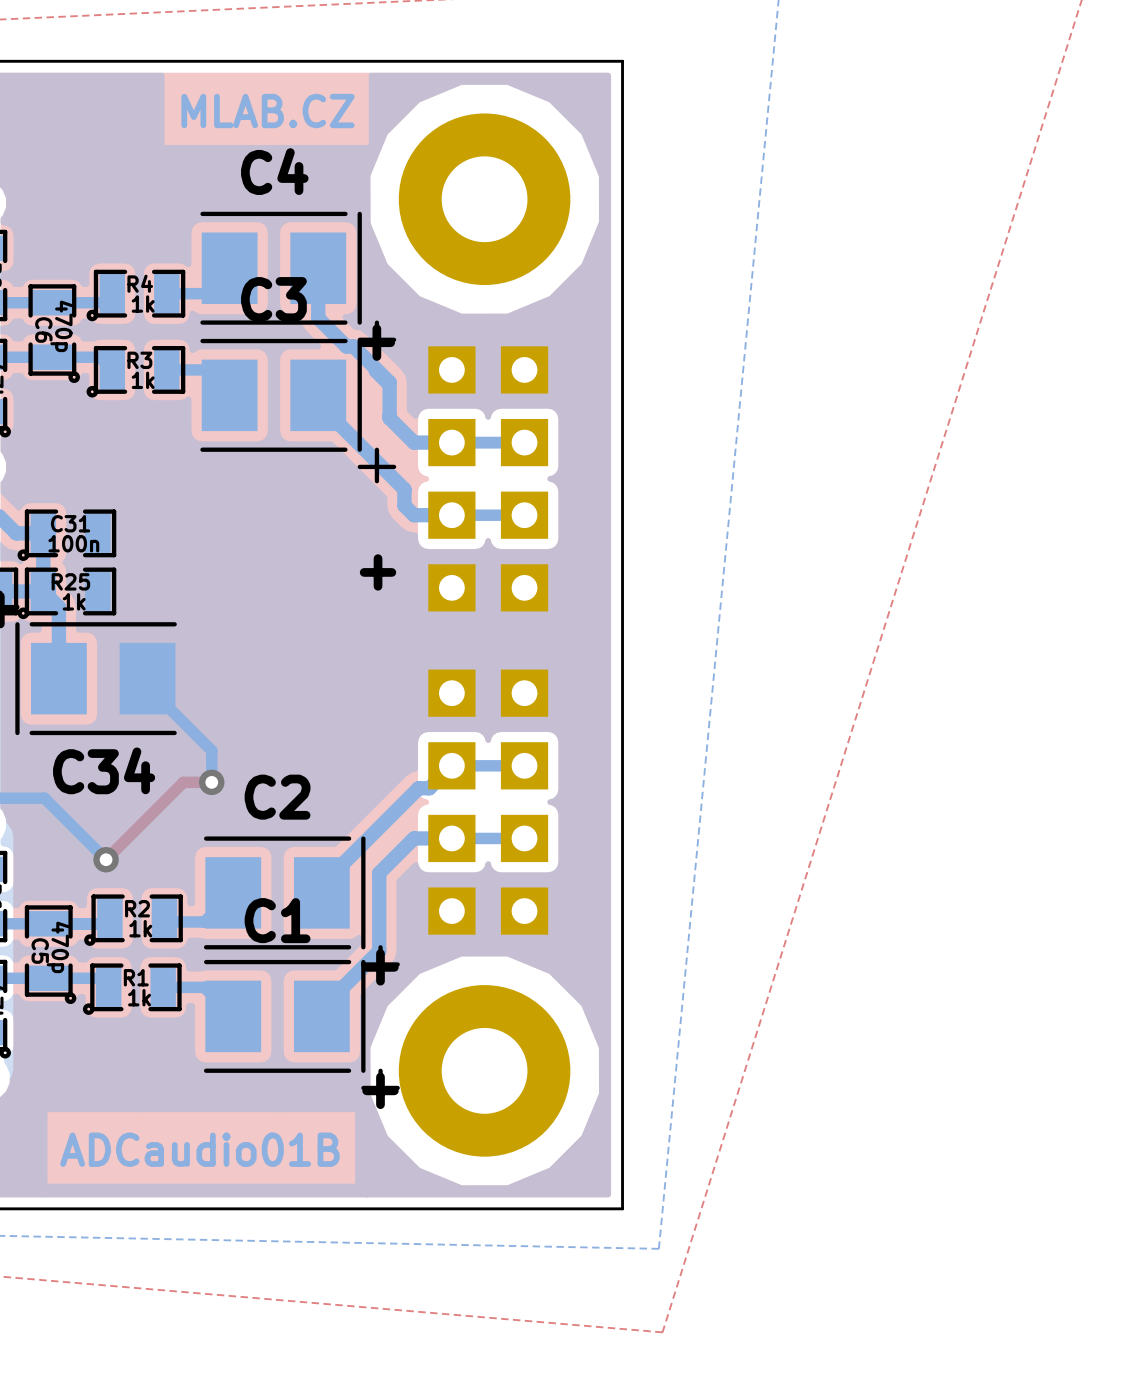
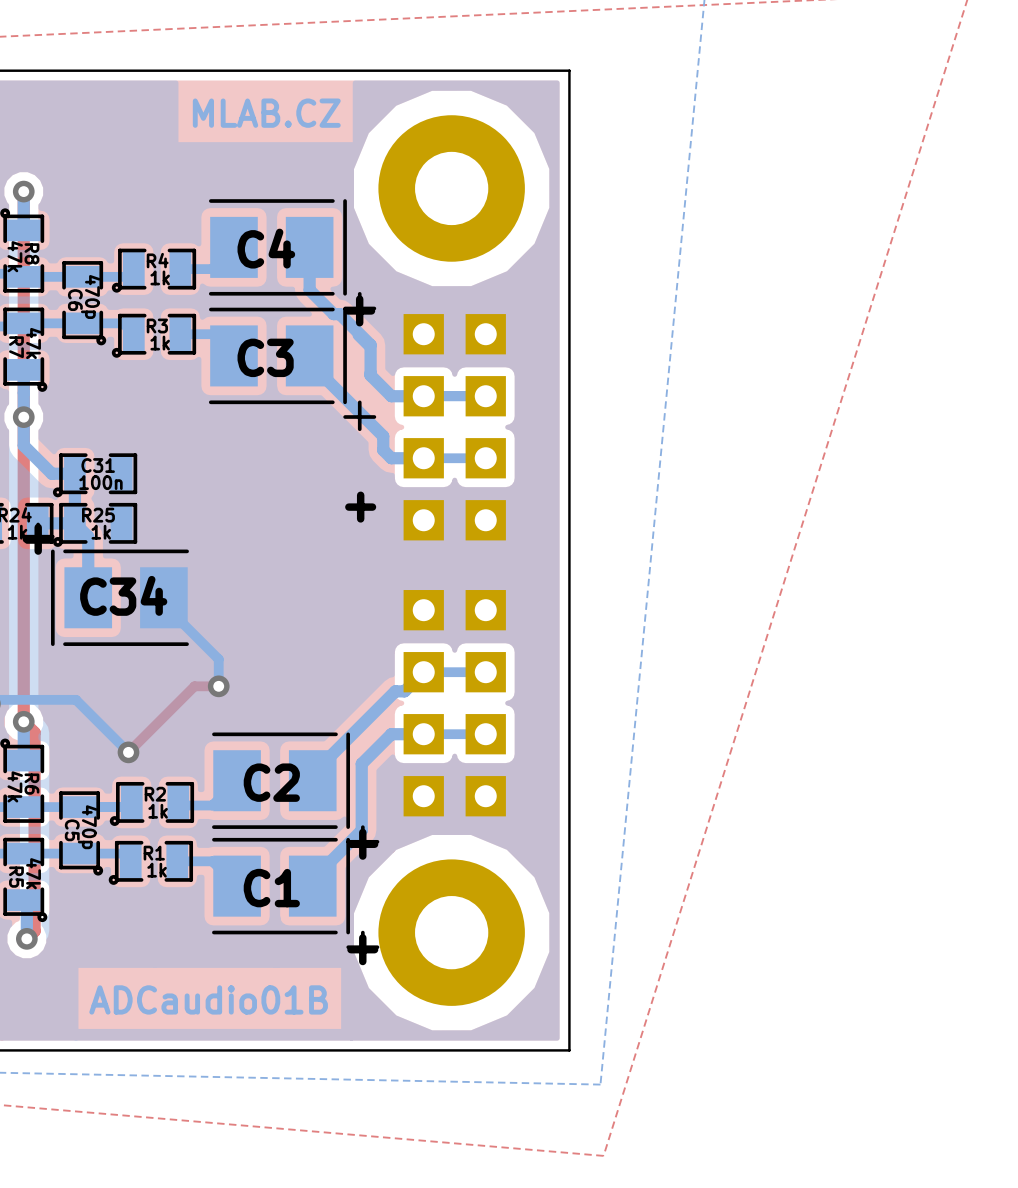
C4 name position: C4 (274, 171) -> C4 (266, 248)
C3 name position: C3 (273, 299) -> C3 (265, 357)
C34 name position: C34 (104, 770) -> C34 (123, 595)
C2 name position: C2 (277, 797) -> C2 (271, 782)
C1 name position: C1 (277, 920) -> C1 (271, 888)

